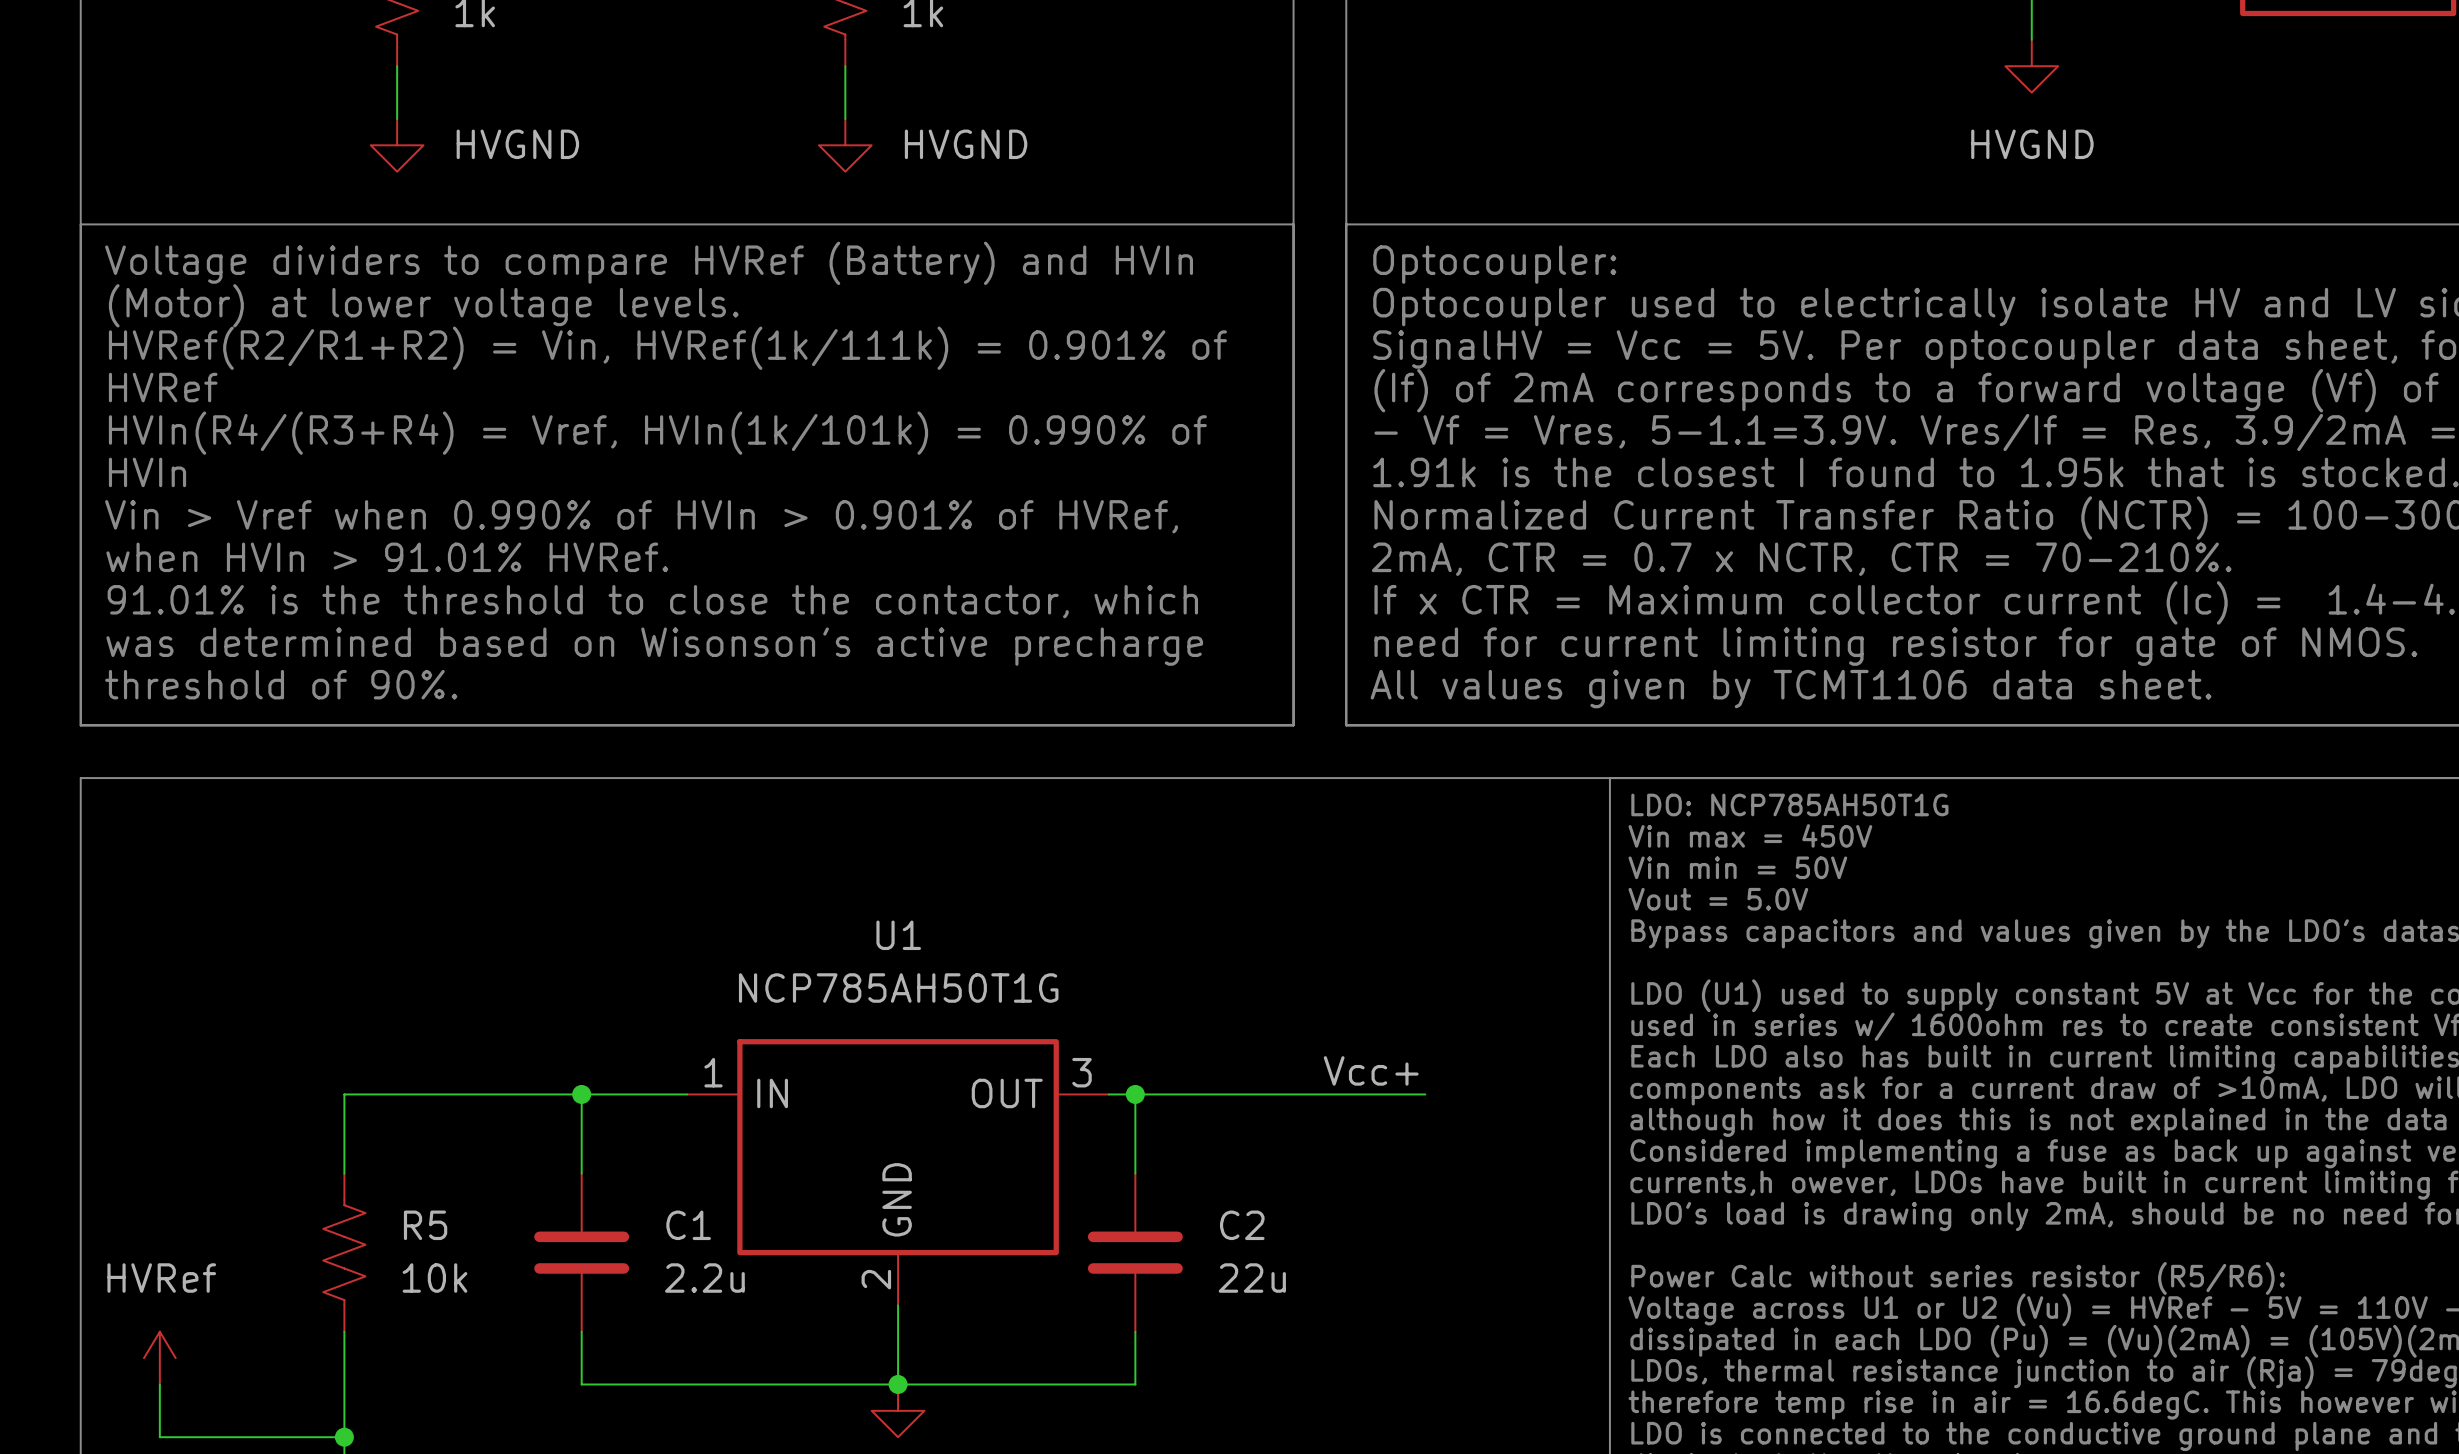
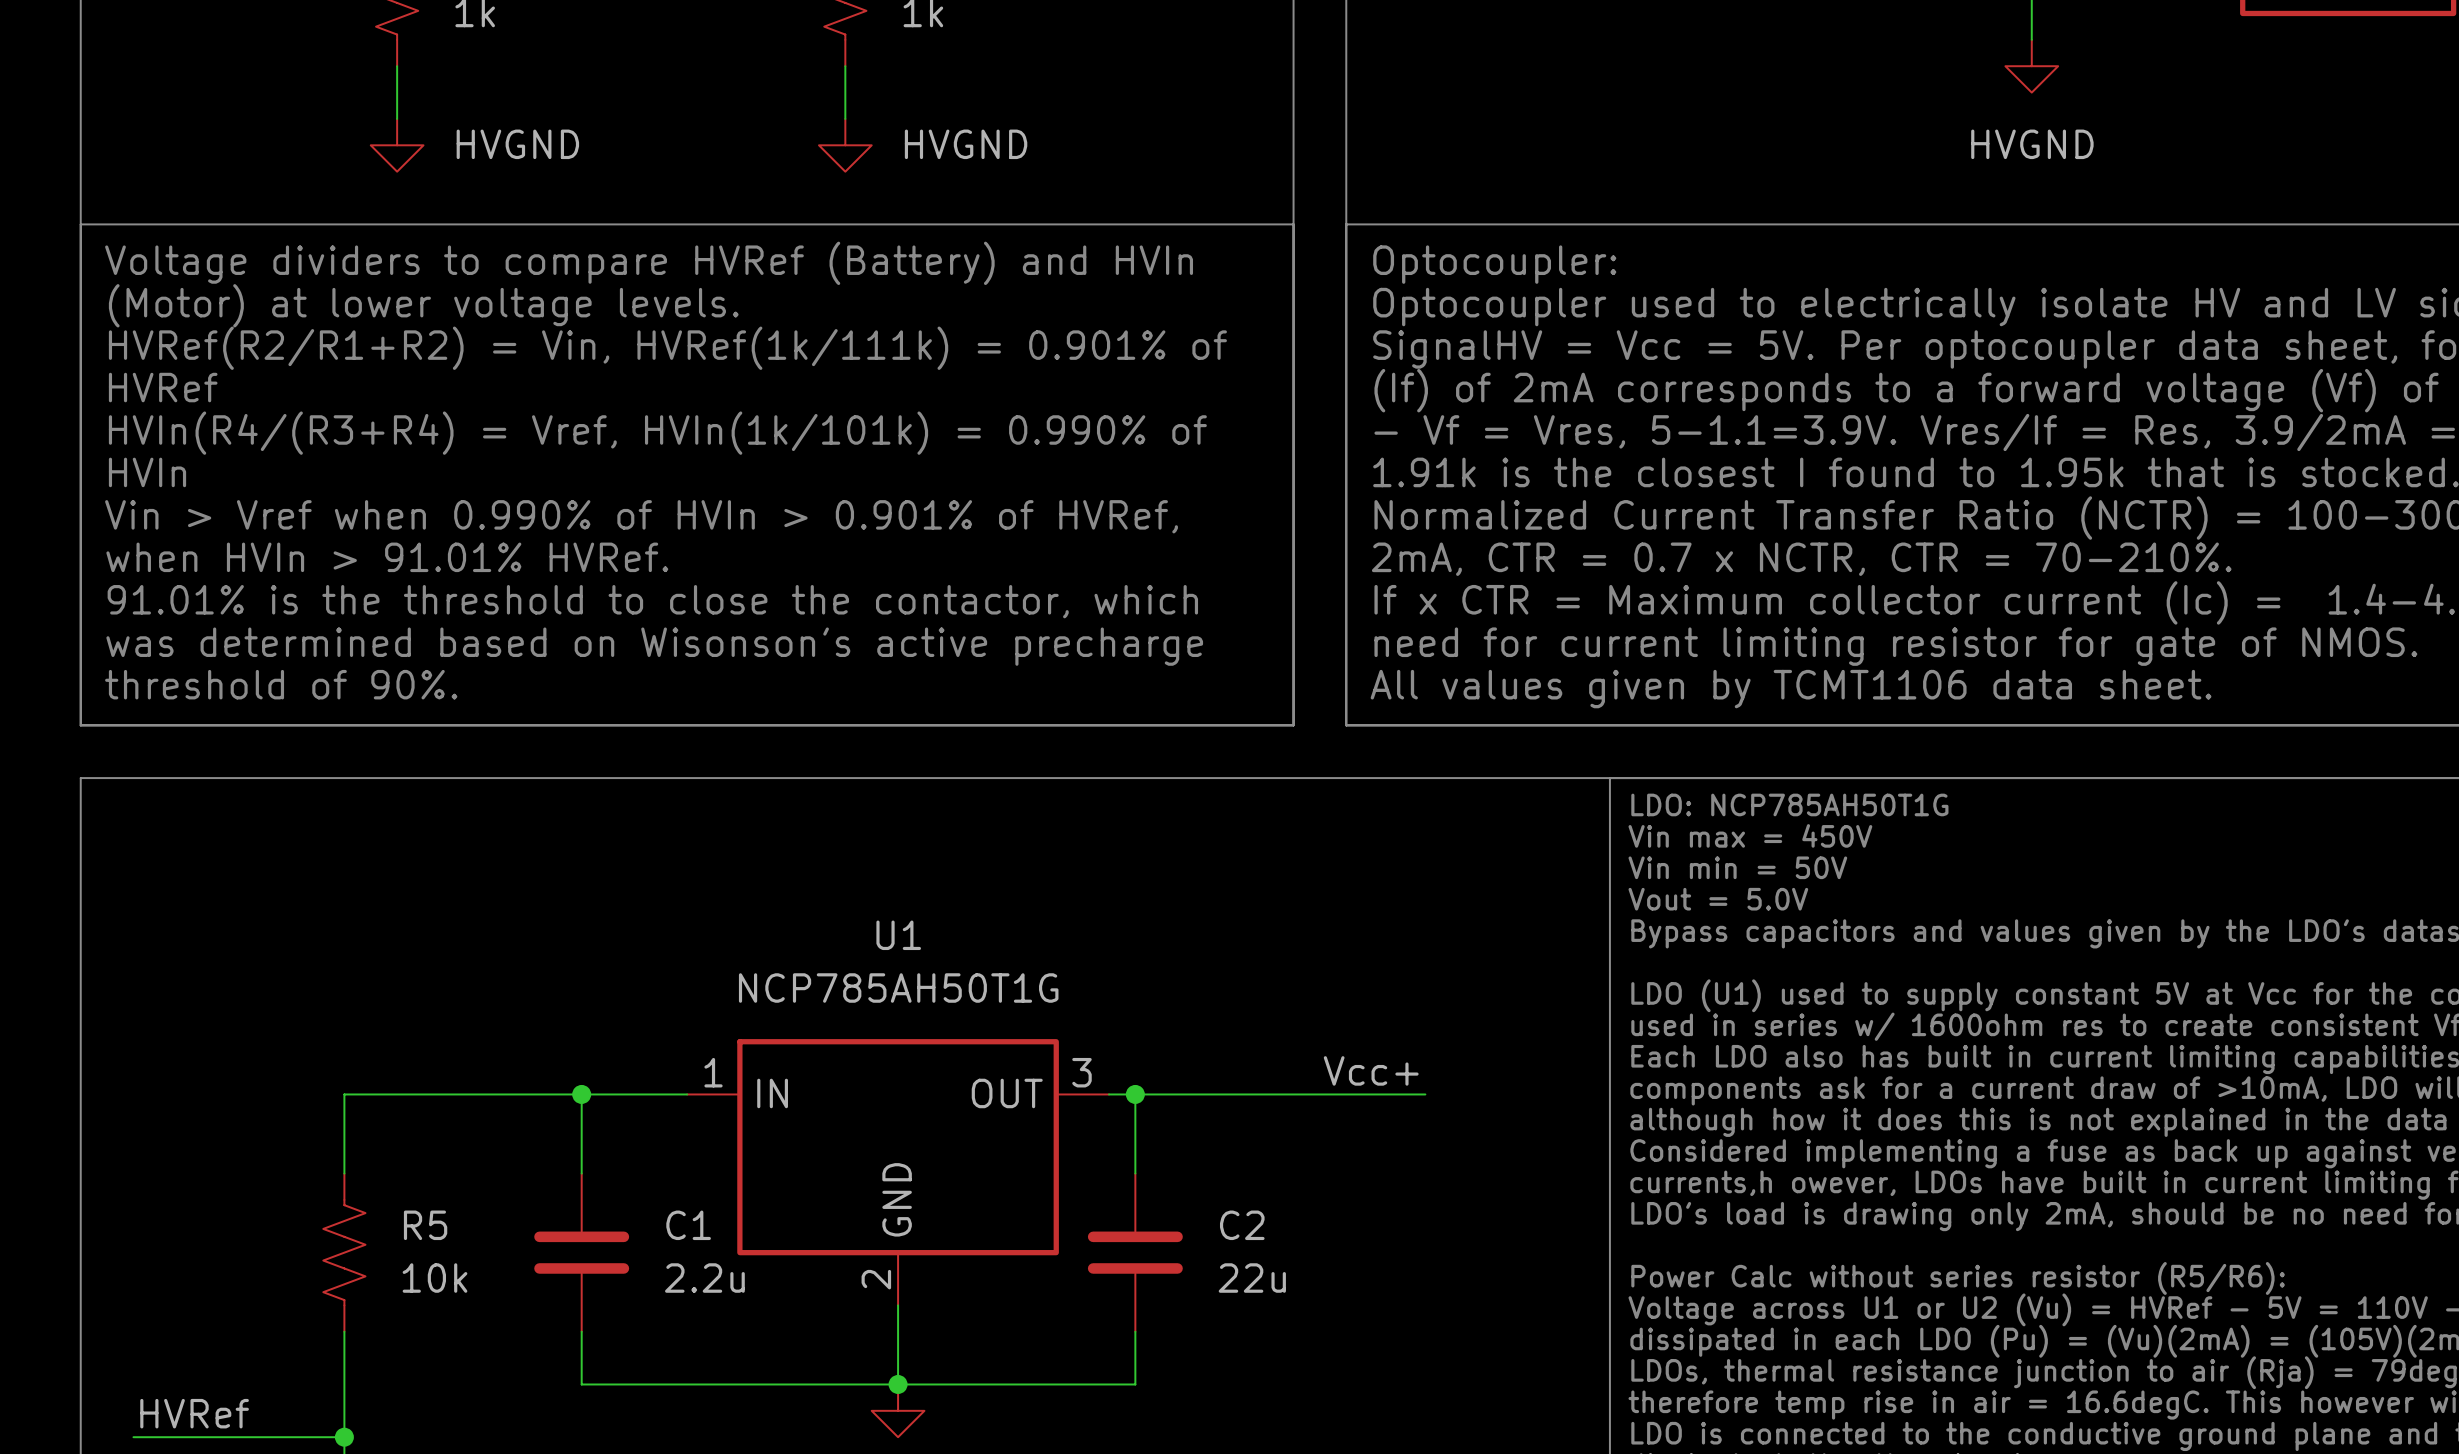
power symbol: HVRef (159, 1358) -> none
wire: (159, 1384) (159, 1437) -> (133, 1437) (159, 1437)
label: none -> HVRef (194, 1413)

